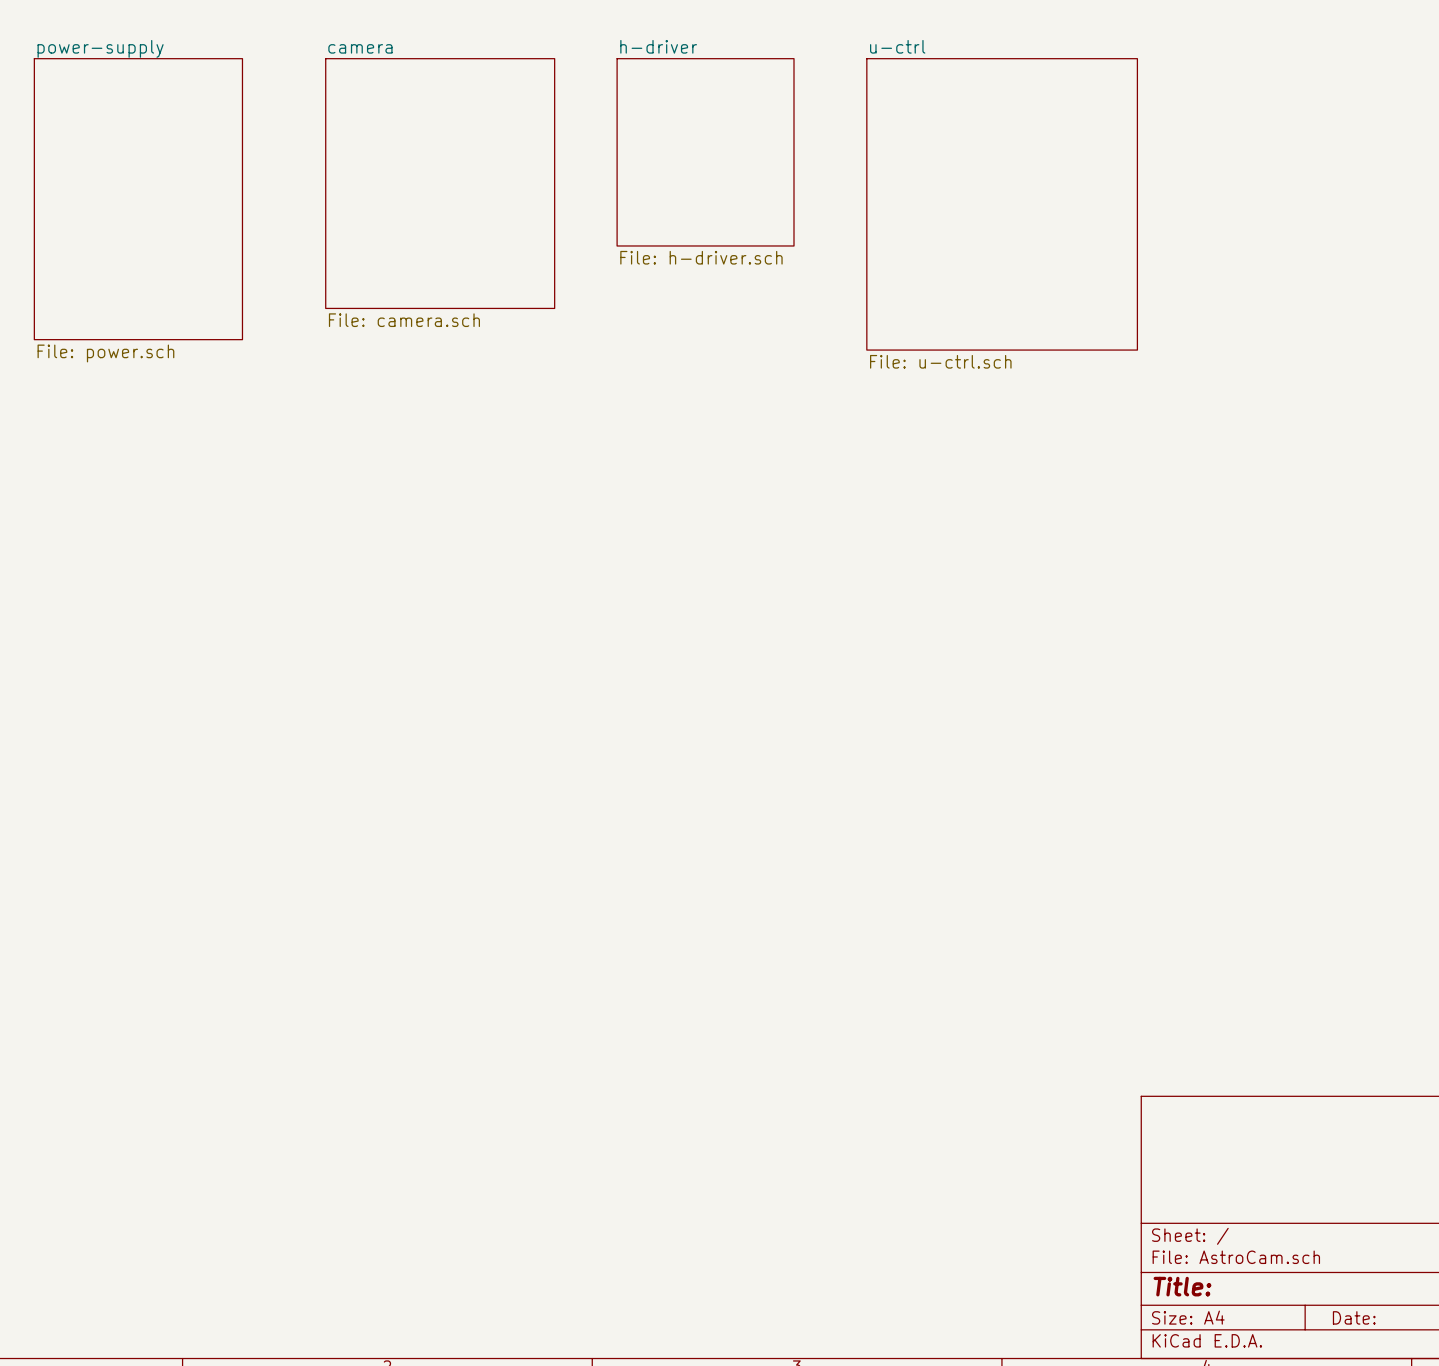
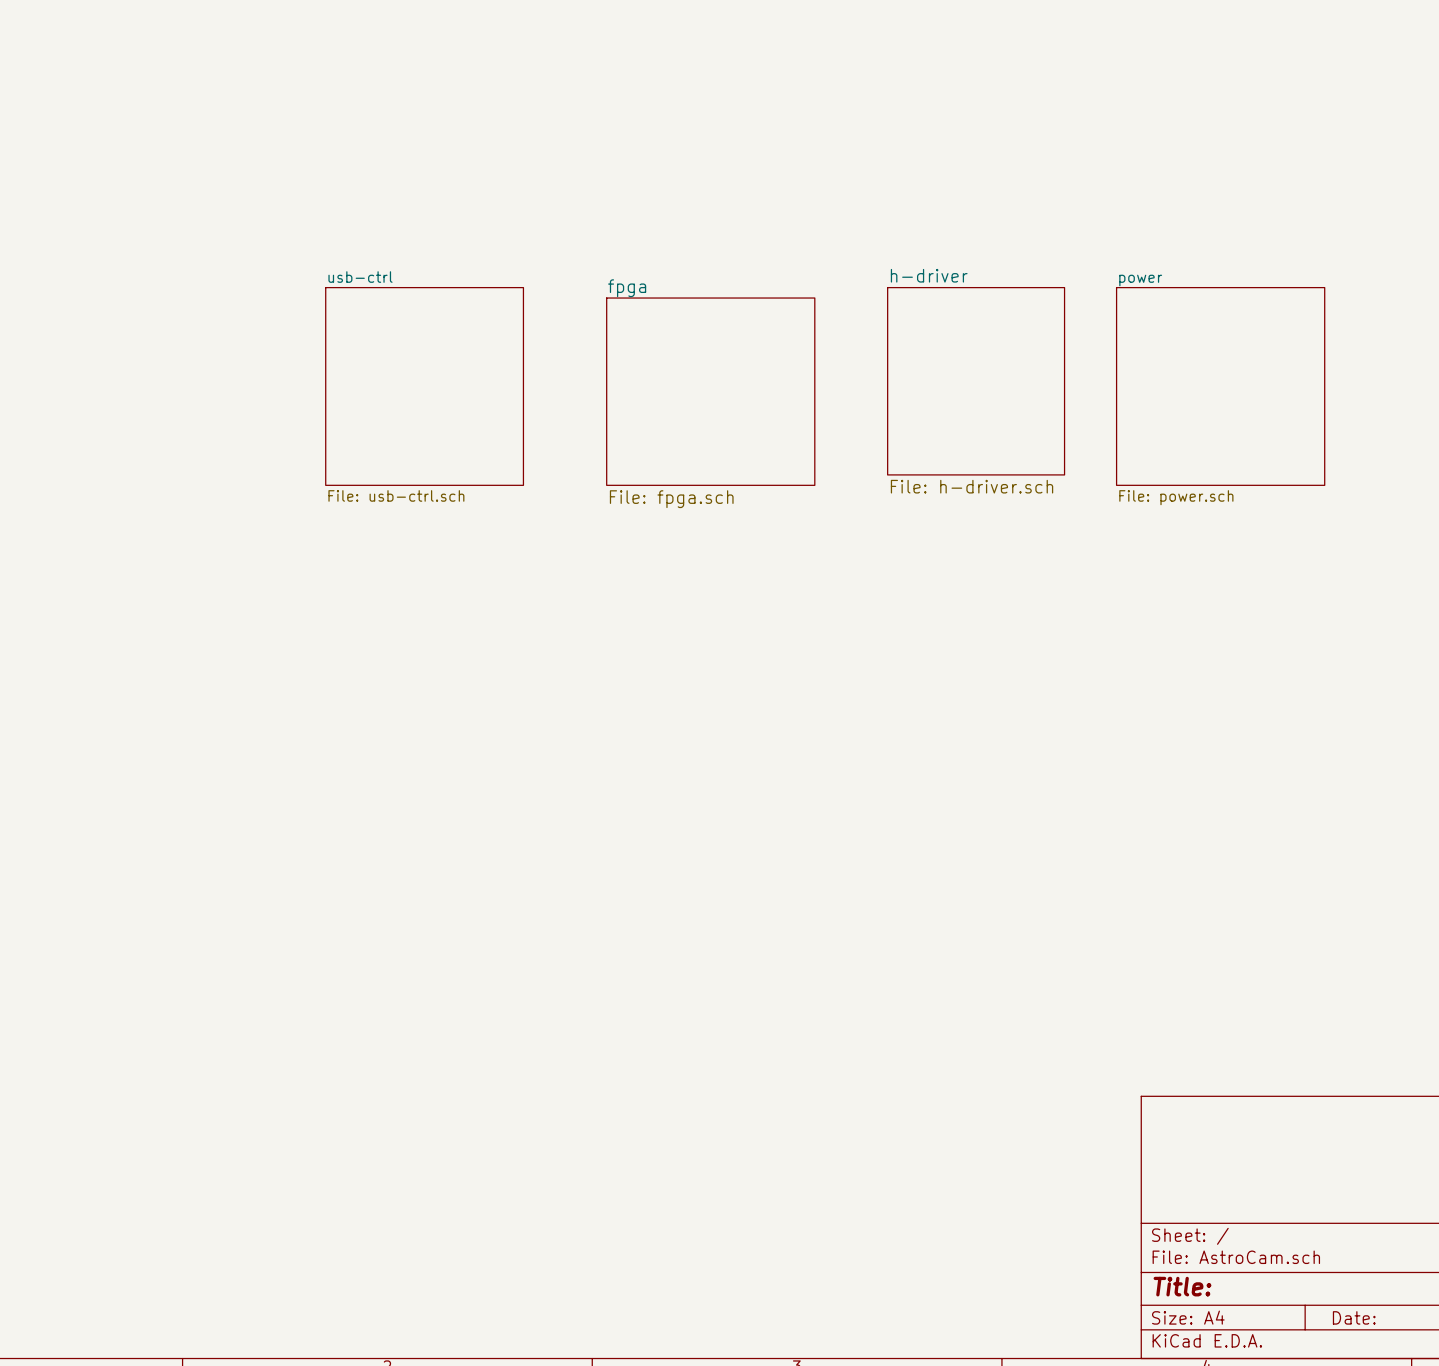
sheet h-driver: File: h-driver.sch (705, 152) -> none
sheet camera: File: camera.sch (440, 183) -> none
sheet power-supply: File: power.sch (138, 199) -> none
sheet u-ctrl: File: u-ctrl.sch (1002, 204) -> none
sheet h-driver: none -> File: h-driver.sch (976, 381)
sheet usb-ctrl: none -> File: usb-ctrl.sch (424, 386)
sheet power: none -> File: power.sch (1220, 386)
sheet fpga: none -> File: fpga.sch (710, 391)

